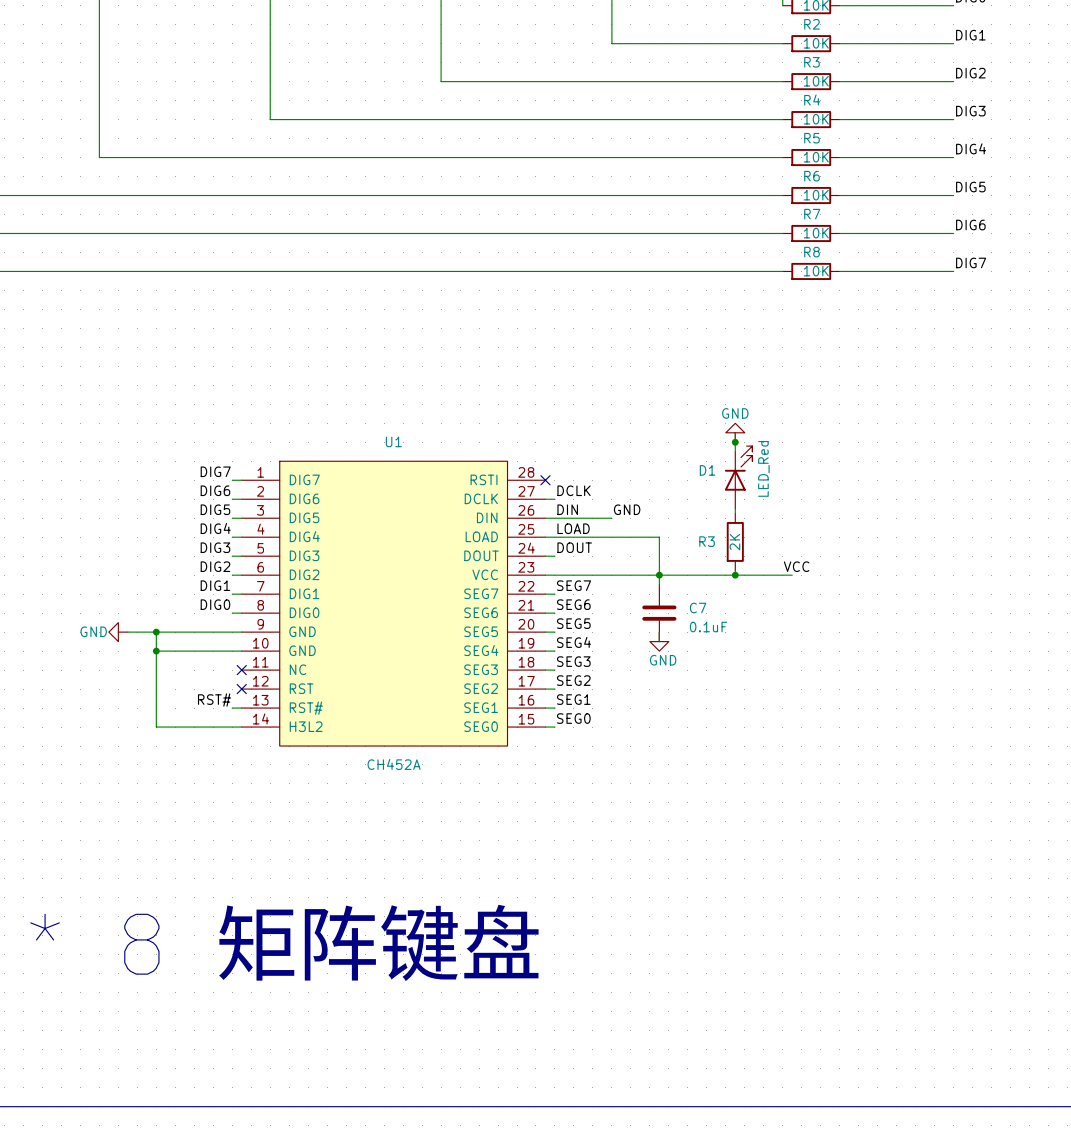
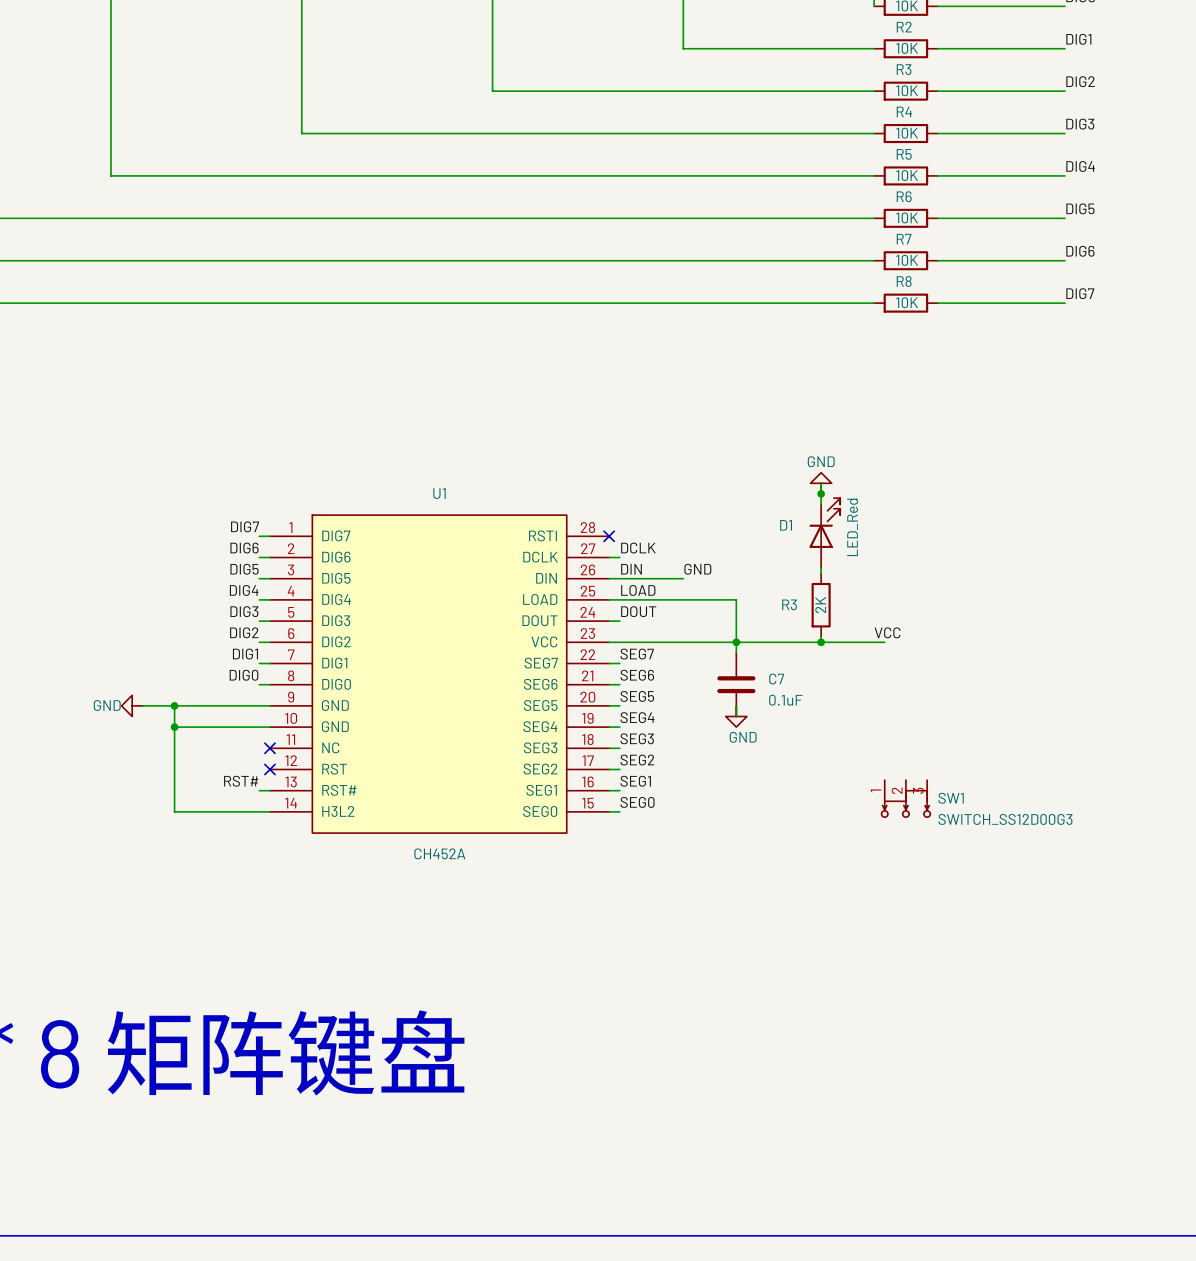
SW1: none -> SWITCH_SS12D00G3 (905, 798)

